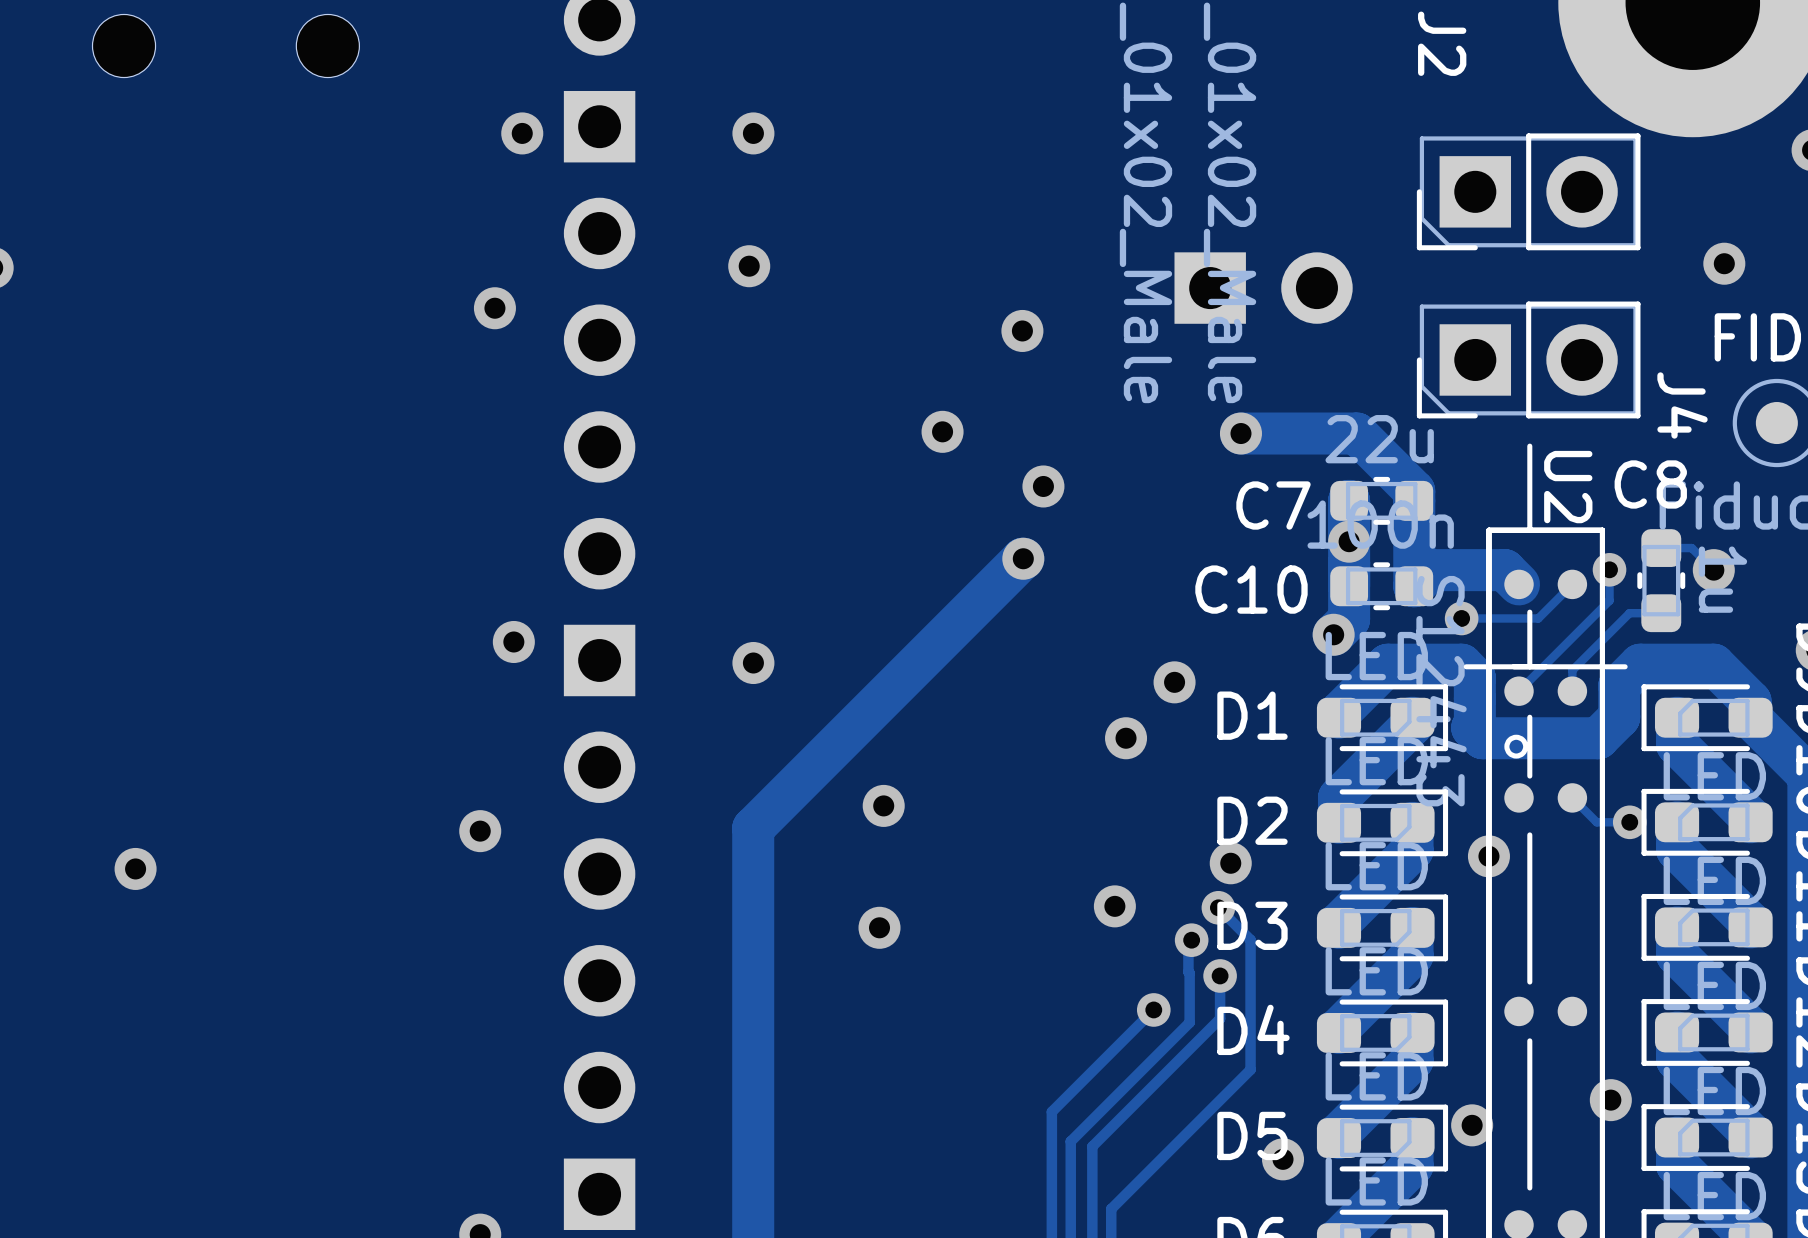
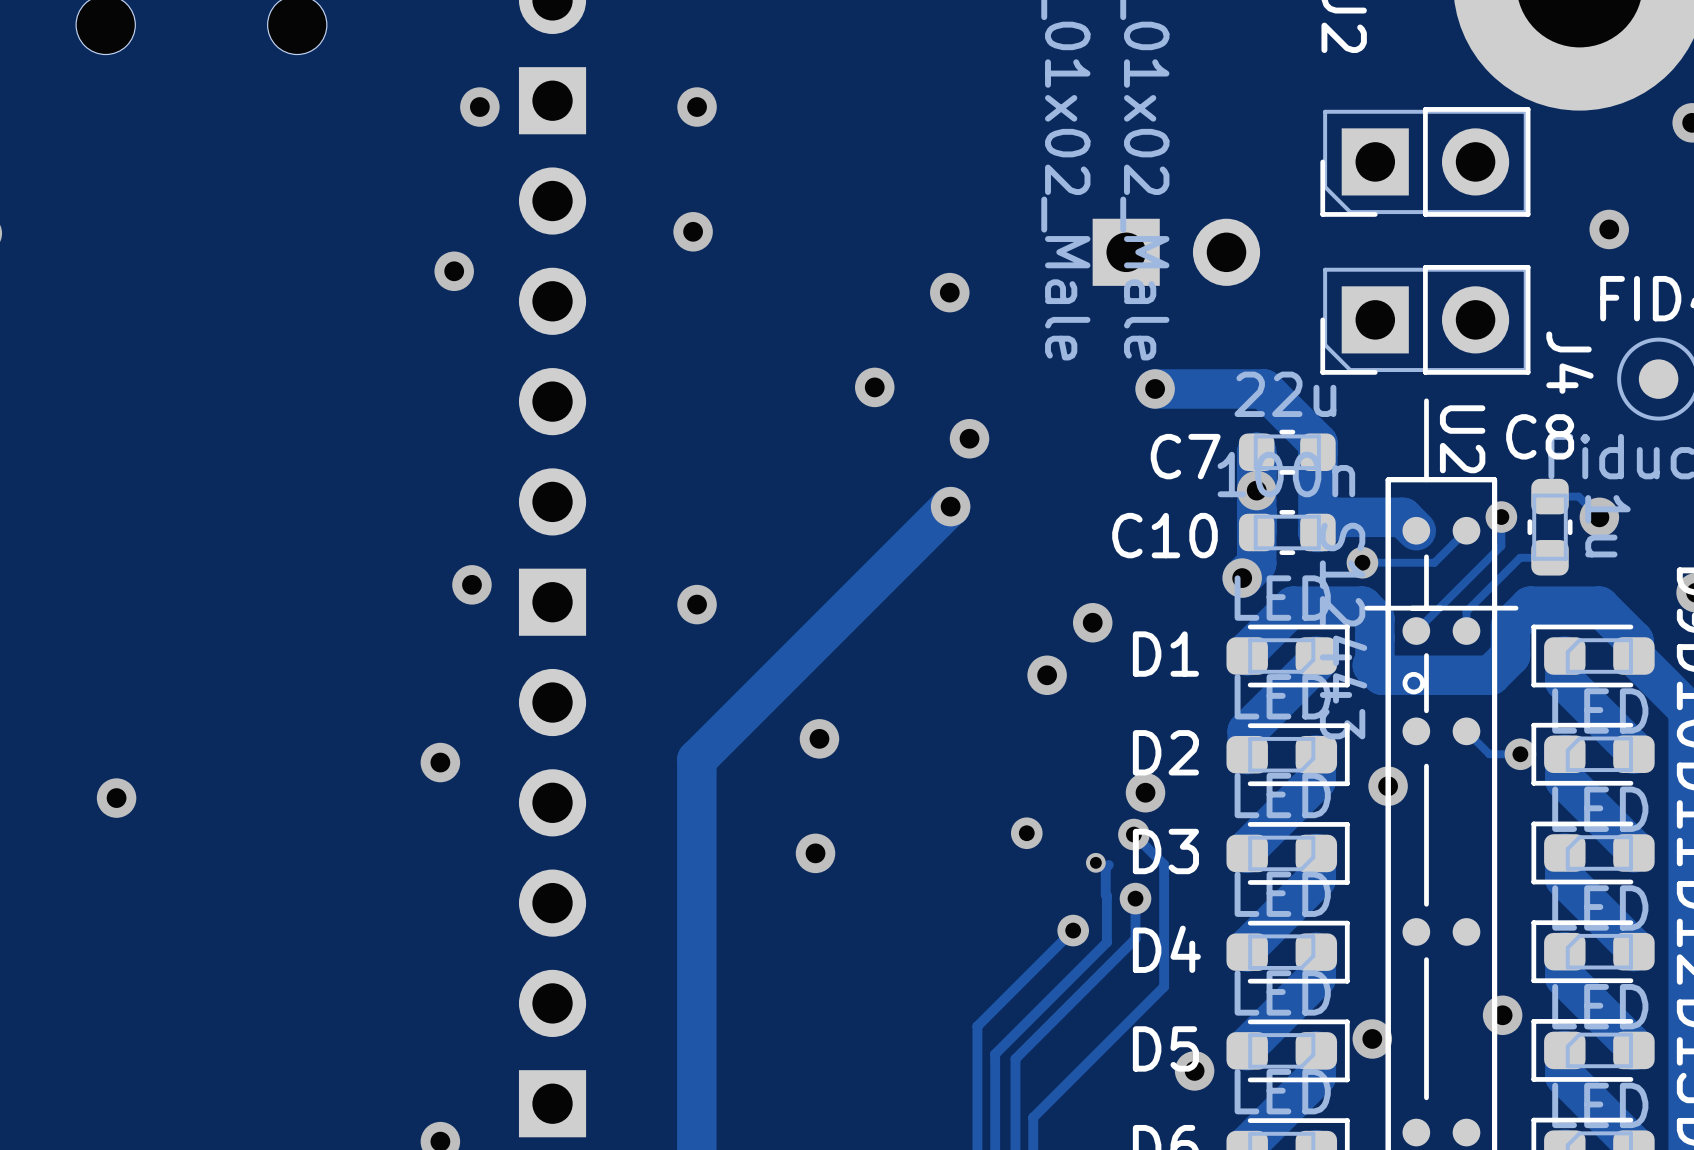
via: (1114, 906) -> none
via: none -> (1095, 862)
via position: (1191, 940) -> (1026, 833)

